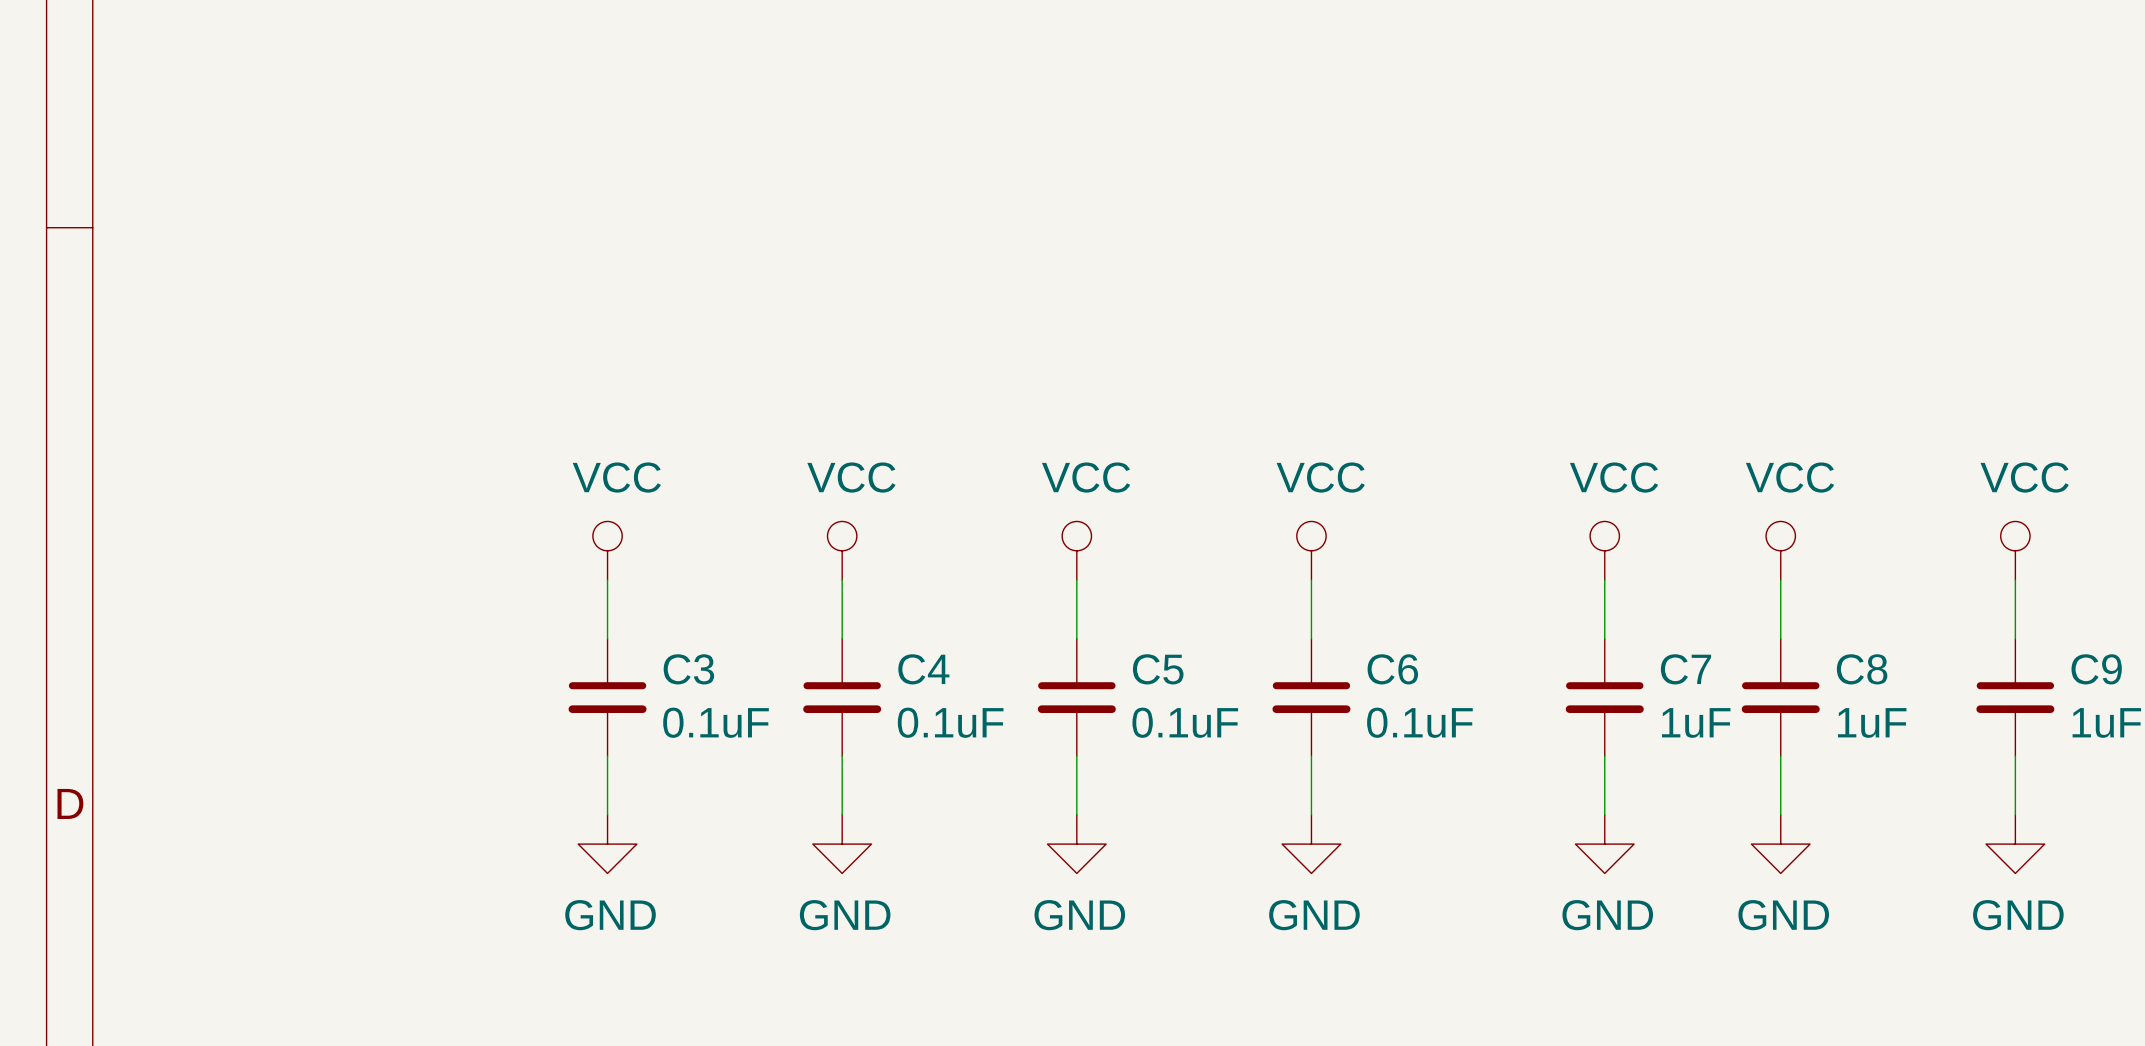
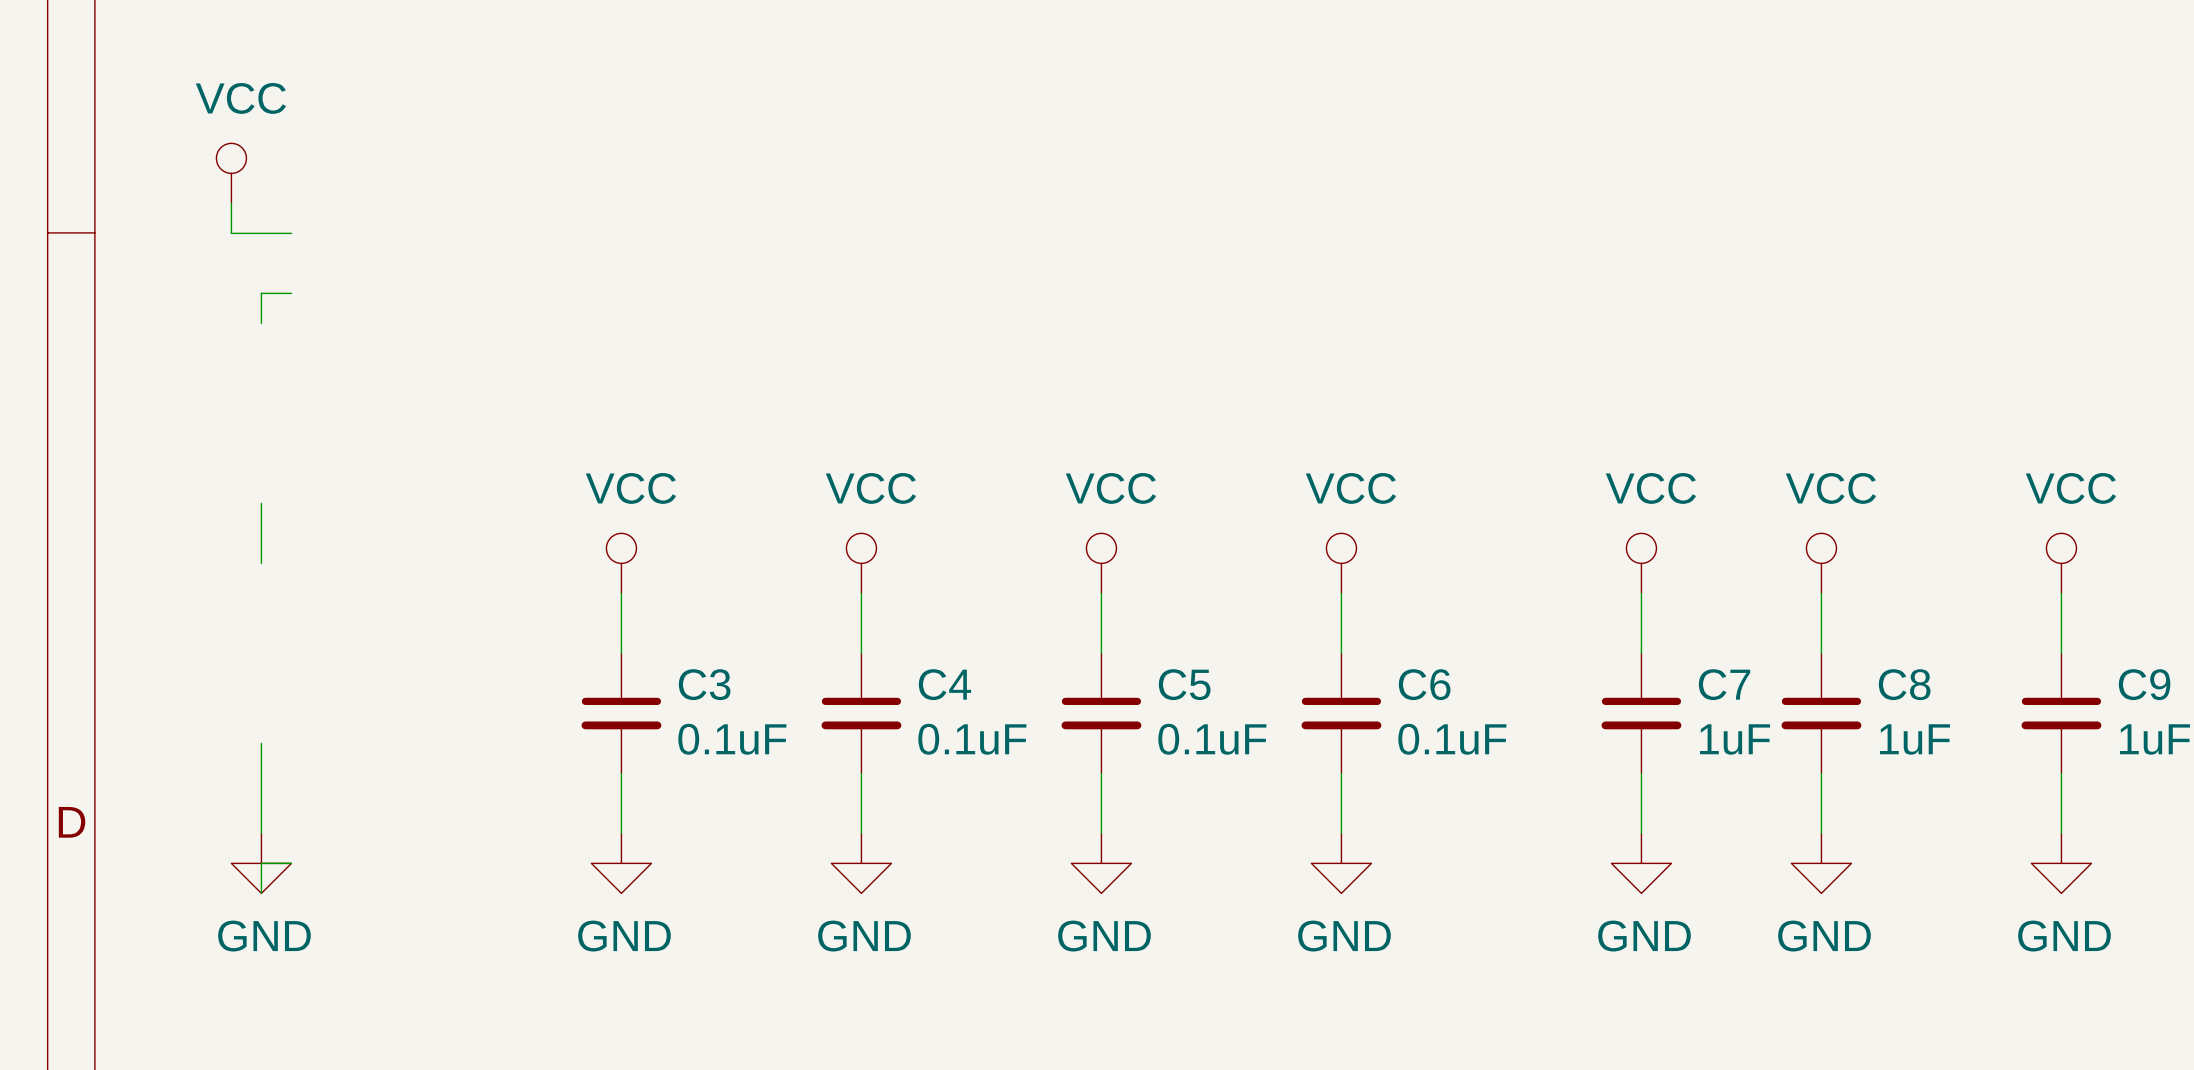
power symbol: none -> VCC (231, 173)
wire: none -> (231, 203) (231, 233) (291, 233)
wire: none -> (291, 293) (261, 293) (261, 323)
wire: none -> (261, 503) (261, 563)
wire: none -> (261, 743) (261, 833)
power symbol: none -> GND (261, 863)
wire: none -> (291, 863) (261, 863) (261, 893)

